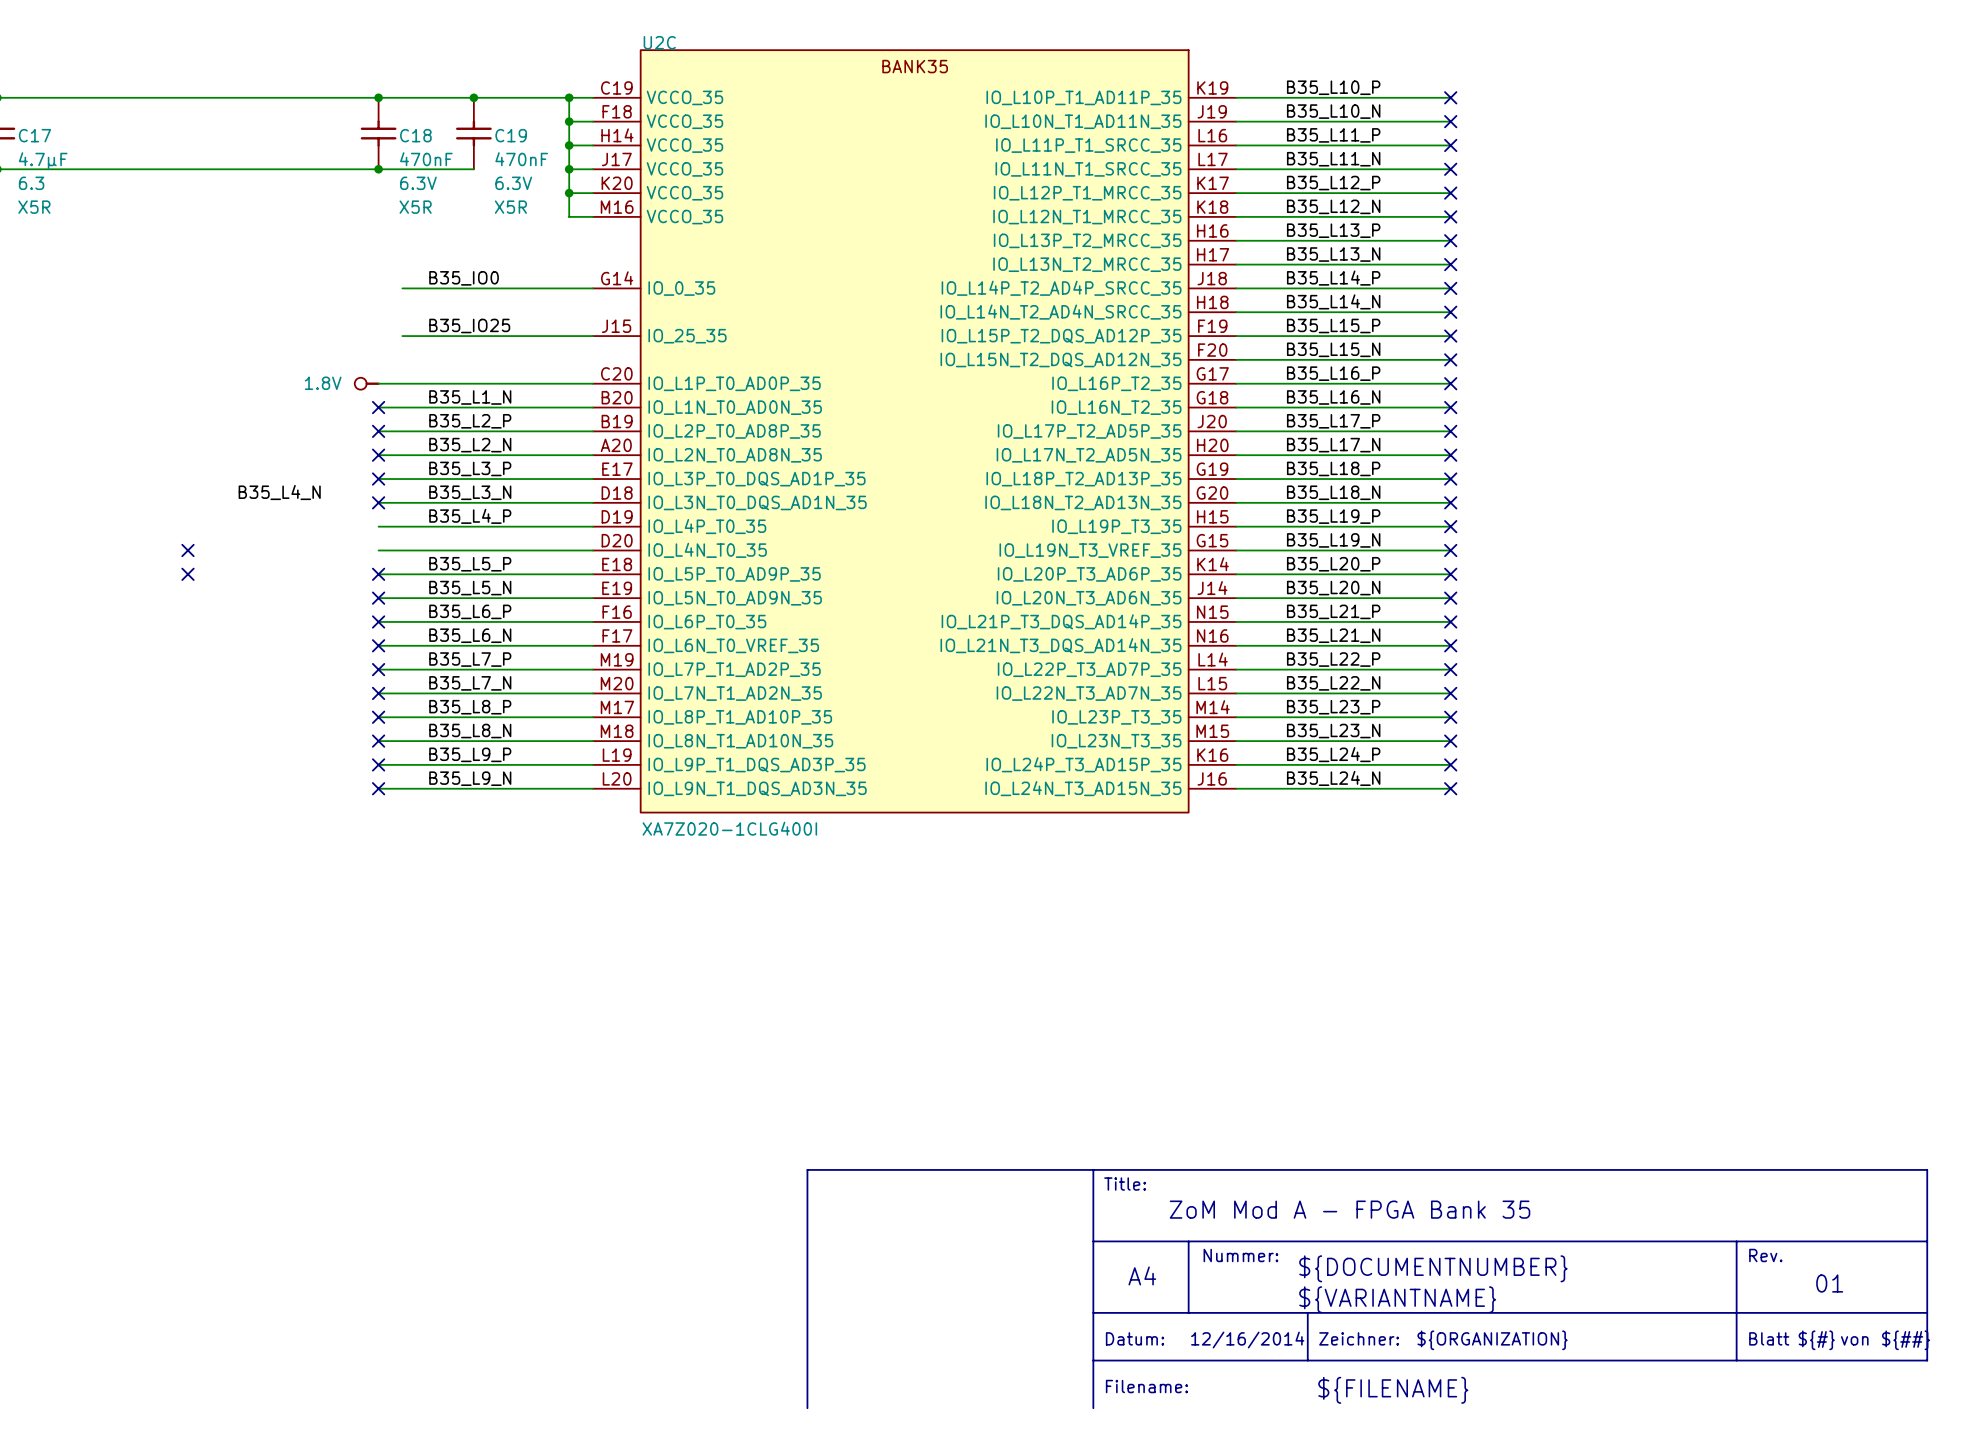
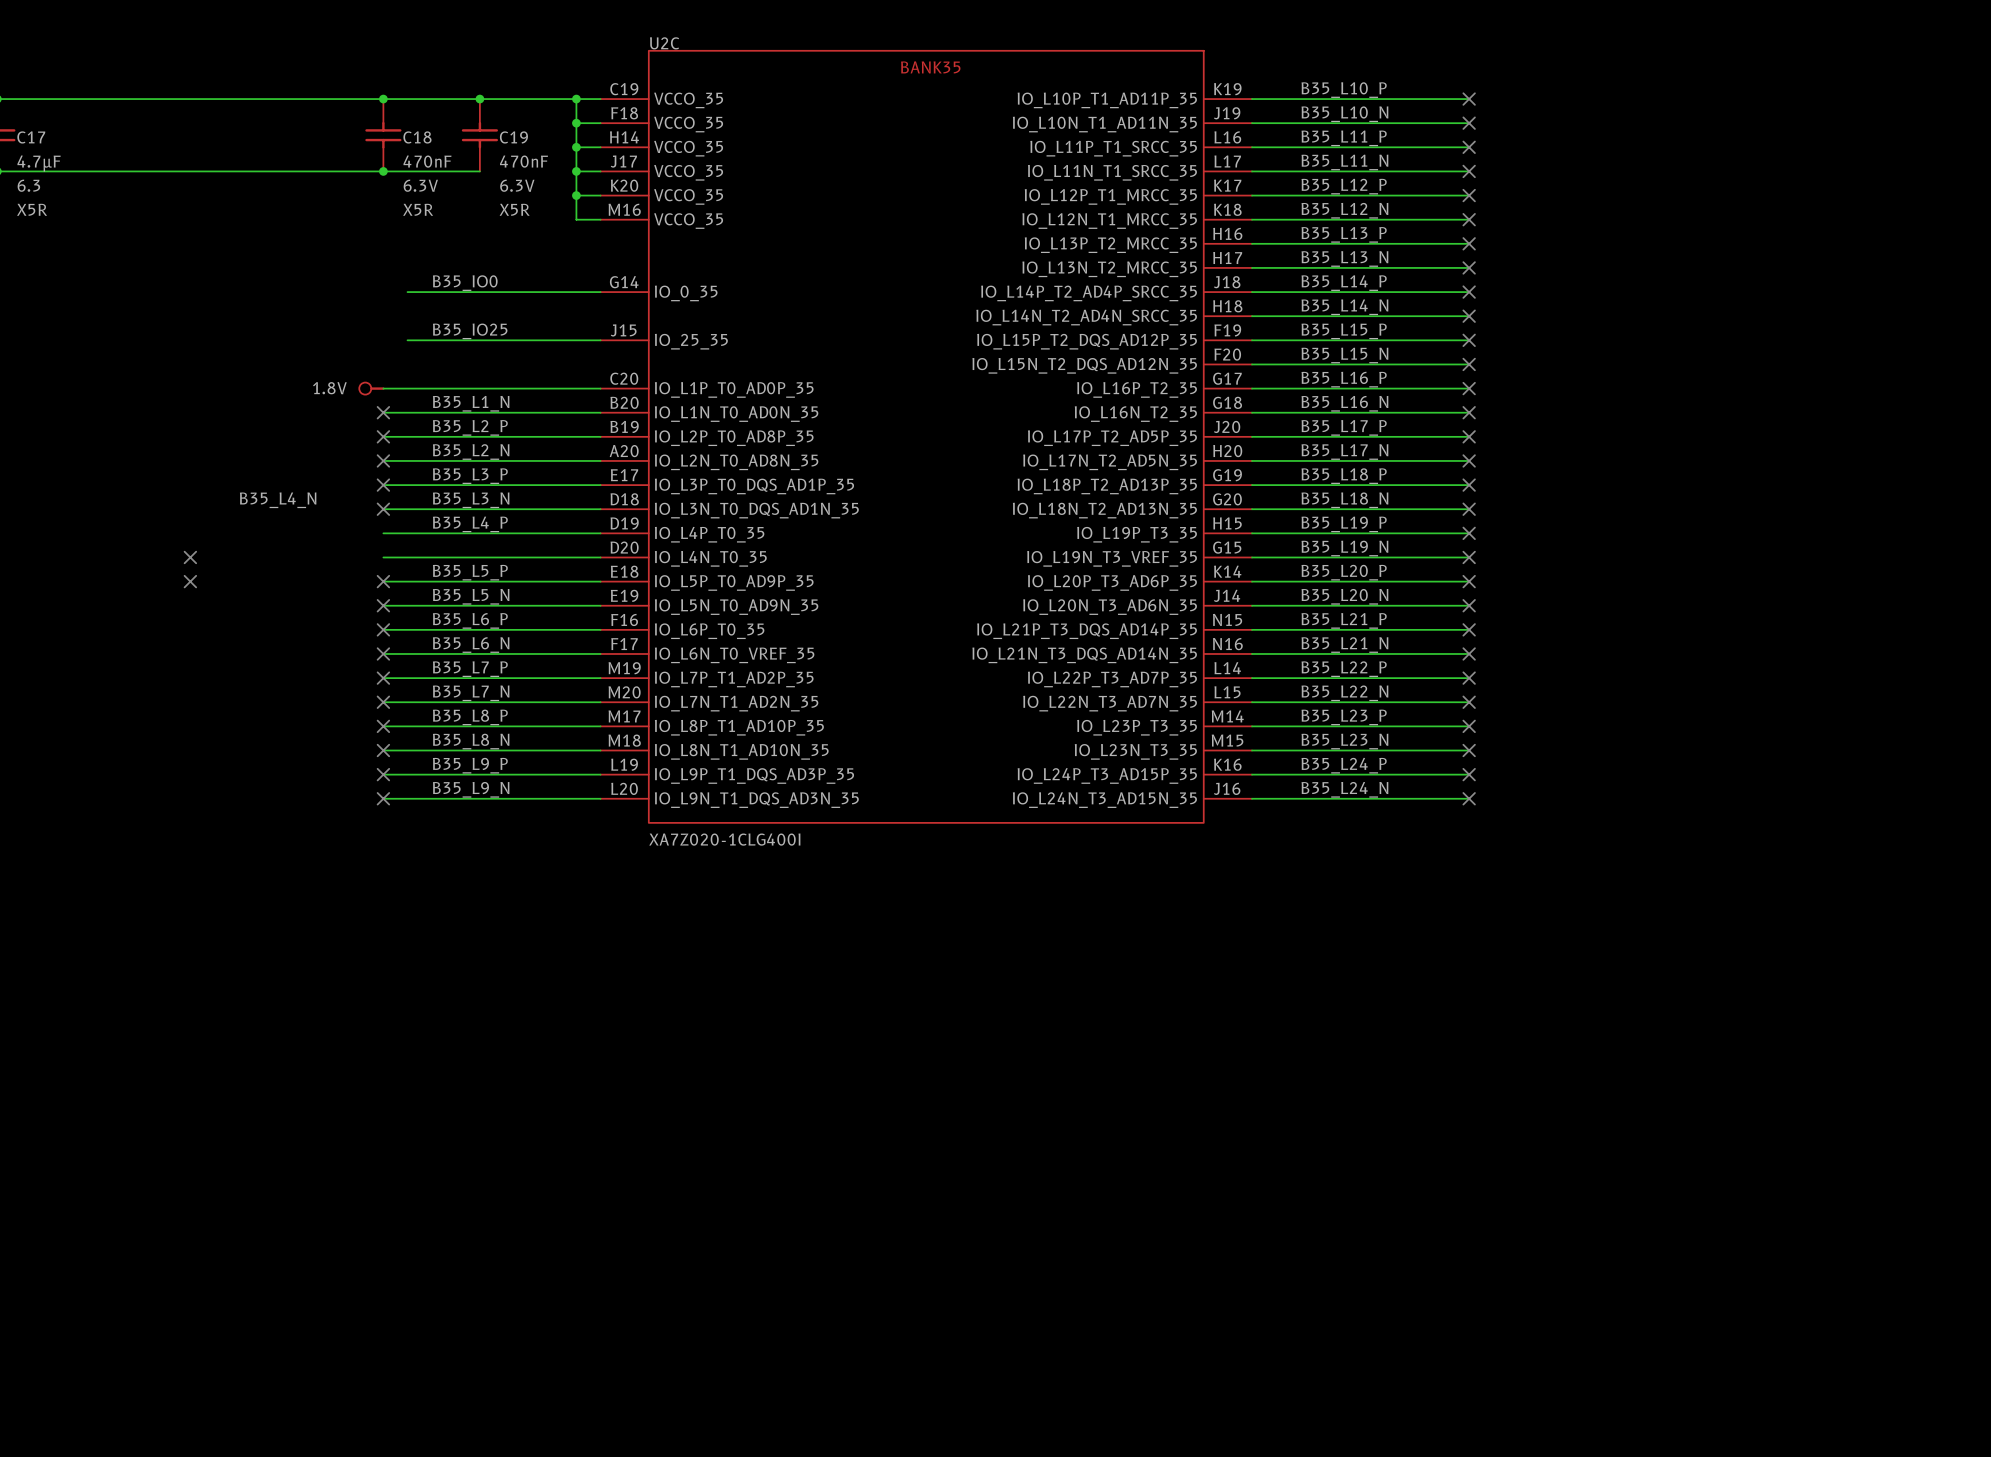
line: (1093, 1169) (1093, 1408) -> none
text: Title: (1125, 1184) -> none
text: ZoM Mod A - FPGA Bank 35 (1350, 1209) -> none
line: (1093, 1241) (1927, 1241) -> none
line: (1188, 1241) (1188, 1312) -> none
line: (1736, 1241) (1736, 1360) -> none
text: Nummer: (1240, 1255) -> none
text: Rev. (1765, 1255) -> none
text: ${DOCUMENTNUMBER} (1433, 1268) -> none
text: A4 (1142, 1275) -> none
text: 01 (1829, 1283) -> none
text: ${VARIANTNAME} (1397, 1299) -> none
line: (1093, 1312) (1927, 1312) -> none
line: (1307, 1312) (1307, 1360) -> none
text: Datum: (1135, 1338) -> none
text: Zeichner: (1359, 1338) -> none
text: Blatt (1769, 1338) -> none
text: 12/16/2014 (1247, 1340) -> none
text: ${ORGANIZATION} (1492, 1340) -> none
text: ${#} (1816, 1340) -> none
text: von (1854, 1340) -> none
text: ${##} (1906, 1340) -> none
line: (1093, 1360) (1927, 1360) (1927, 1169) (807, 1169) (807, 1408) -> none
text: Filename: (1146, 1386) -> none
text: ${FILENAME} (1393, 1390) -> none

